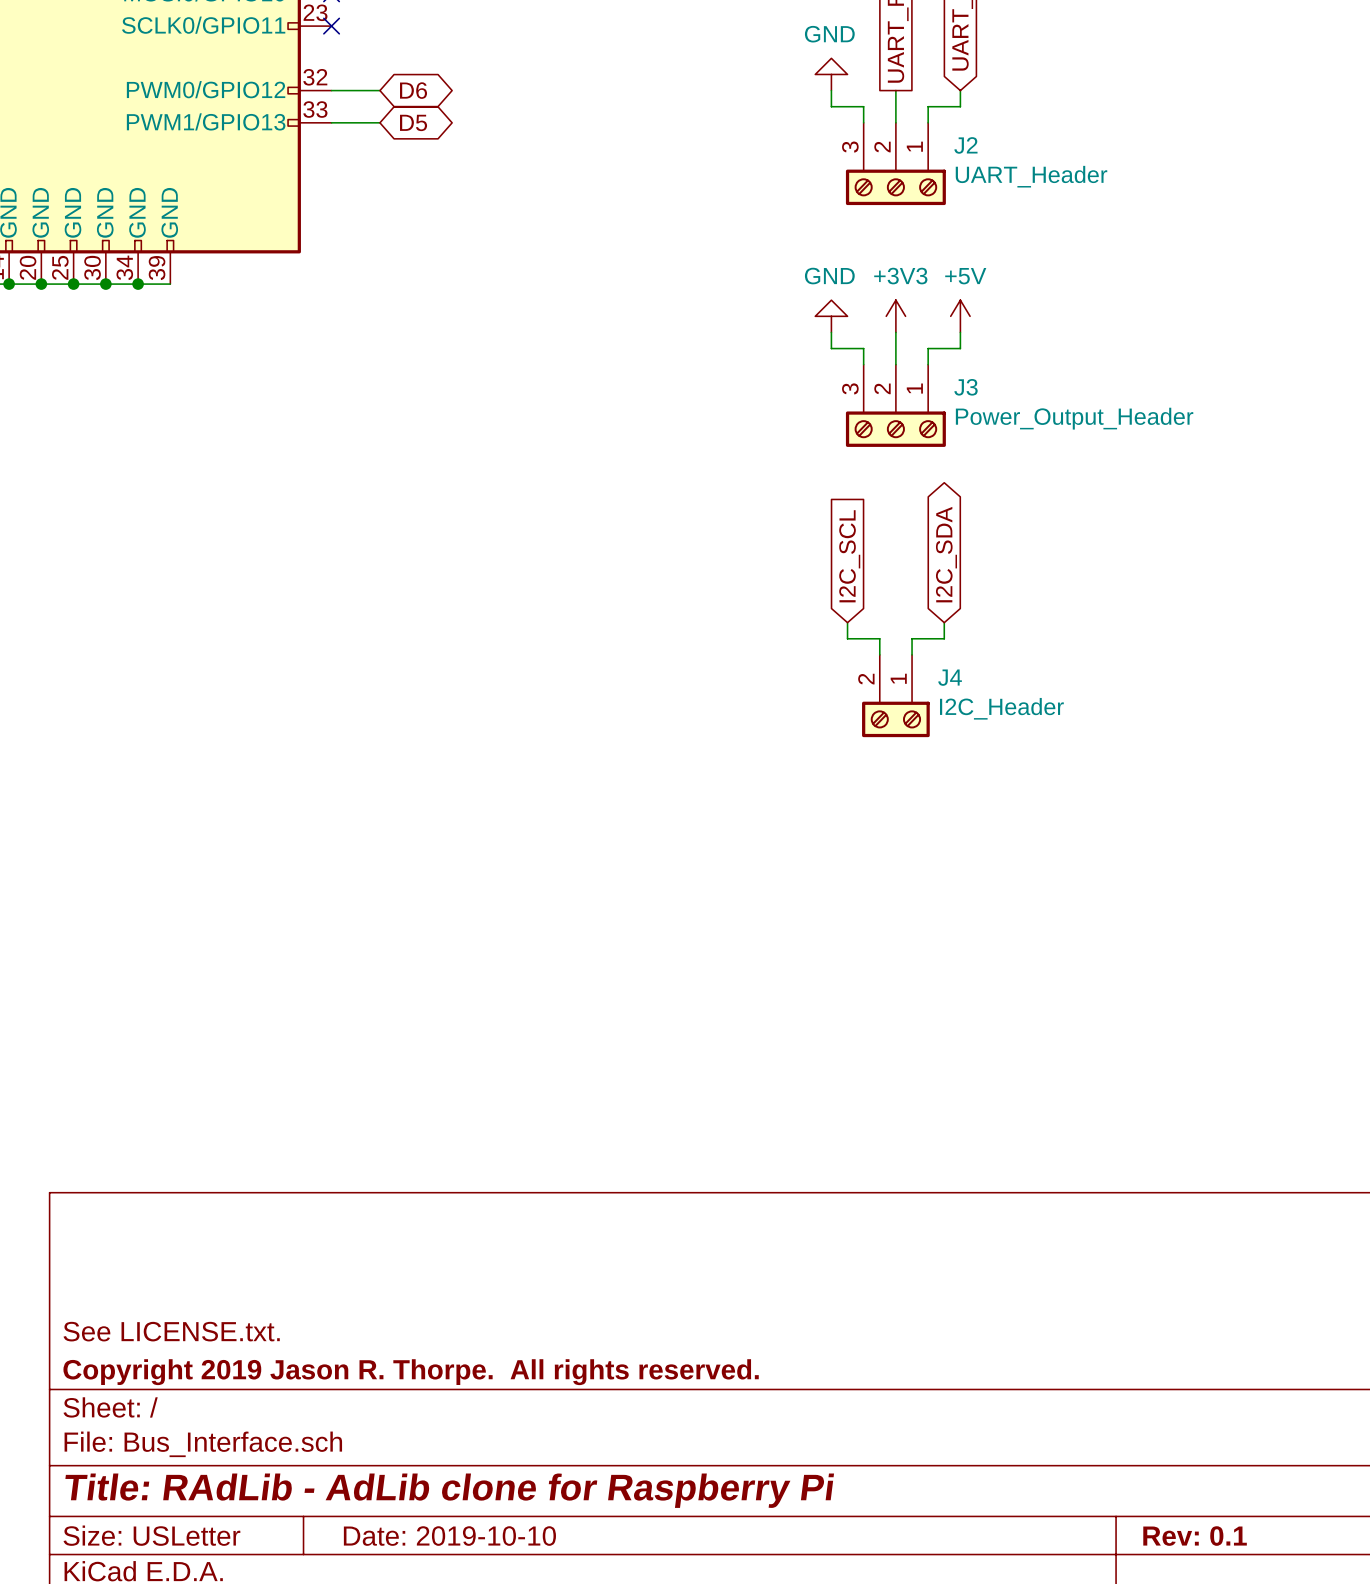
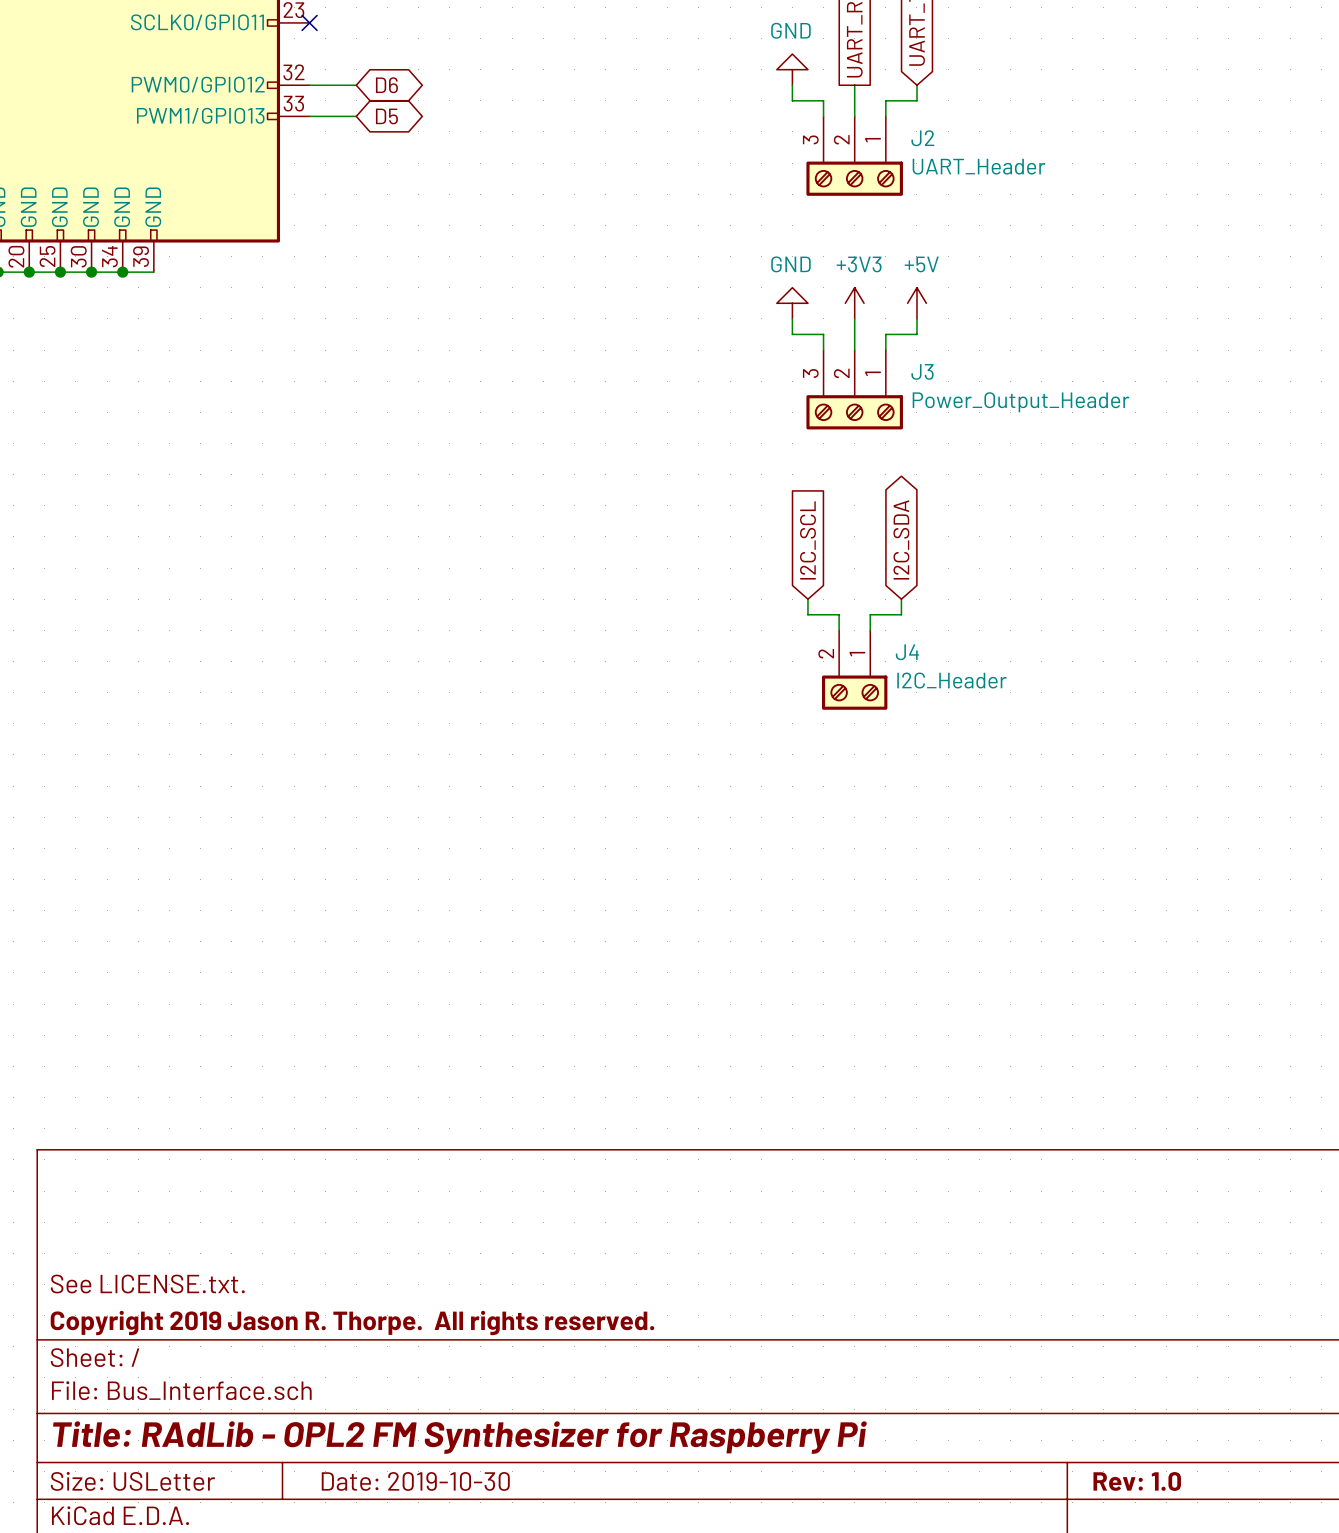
title block: Title: RAdLib - AdLib clone for Raspberry Pi (449, 1490) -> Title: RAdLib - OPL2 FM Synthesizer for Raspberry Pi (459, 1437)
title block: Date: 2019-10-10 (449, 1536) -> Date: 2019-10-30 (415, 1481)
title block: Rev: 0.1 (1195, 1536) -> Rev: 1.0 (1137, 1481)

